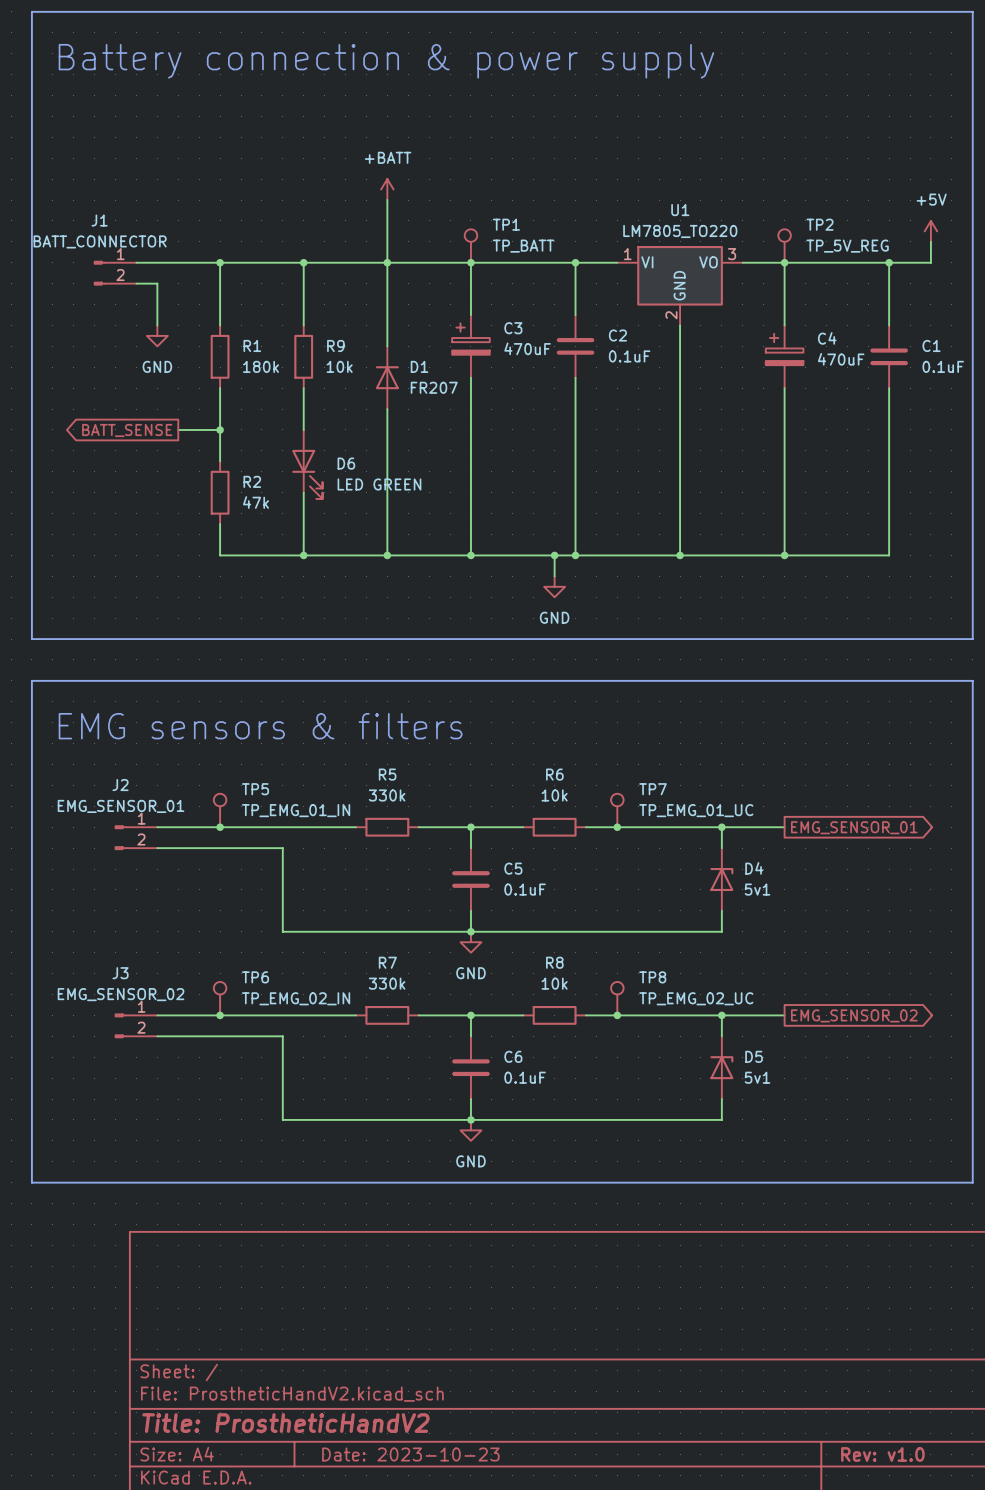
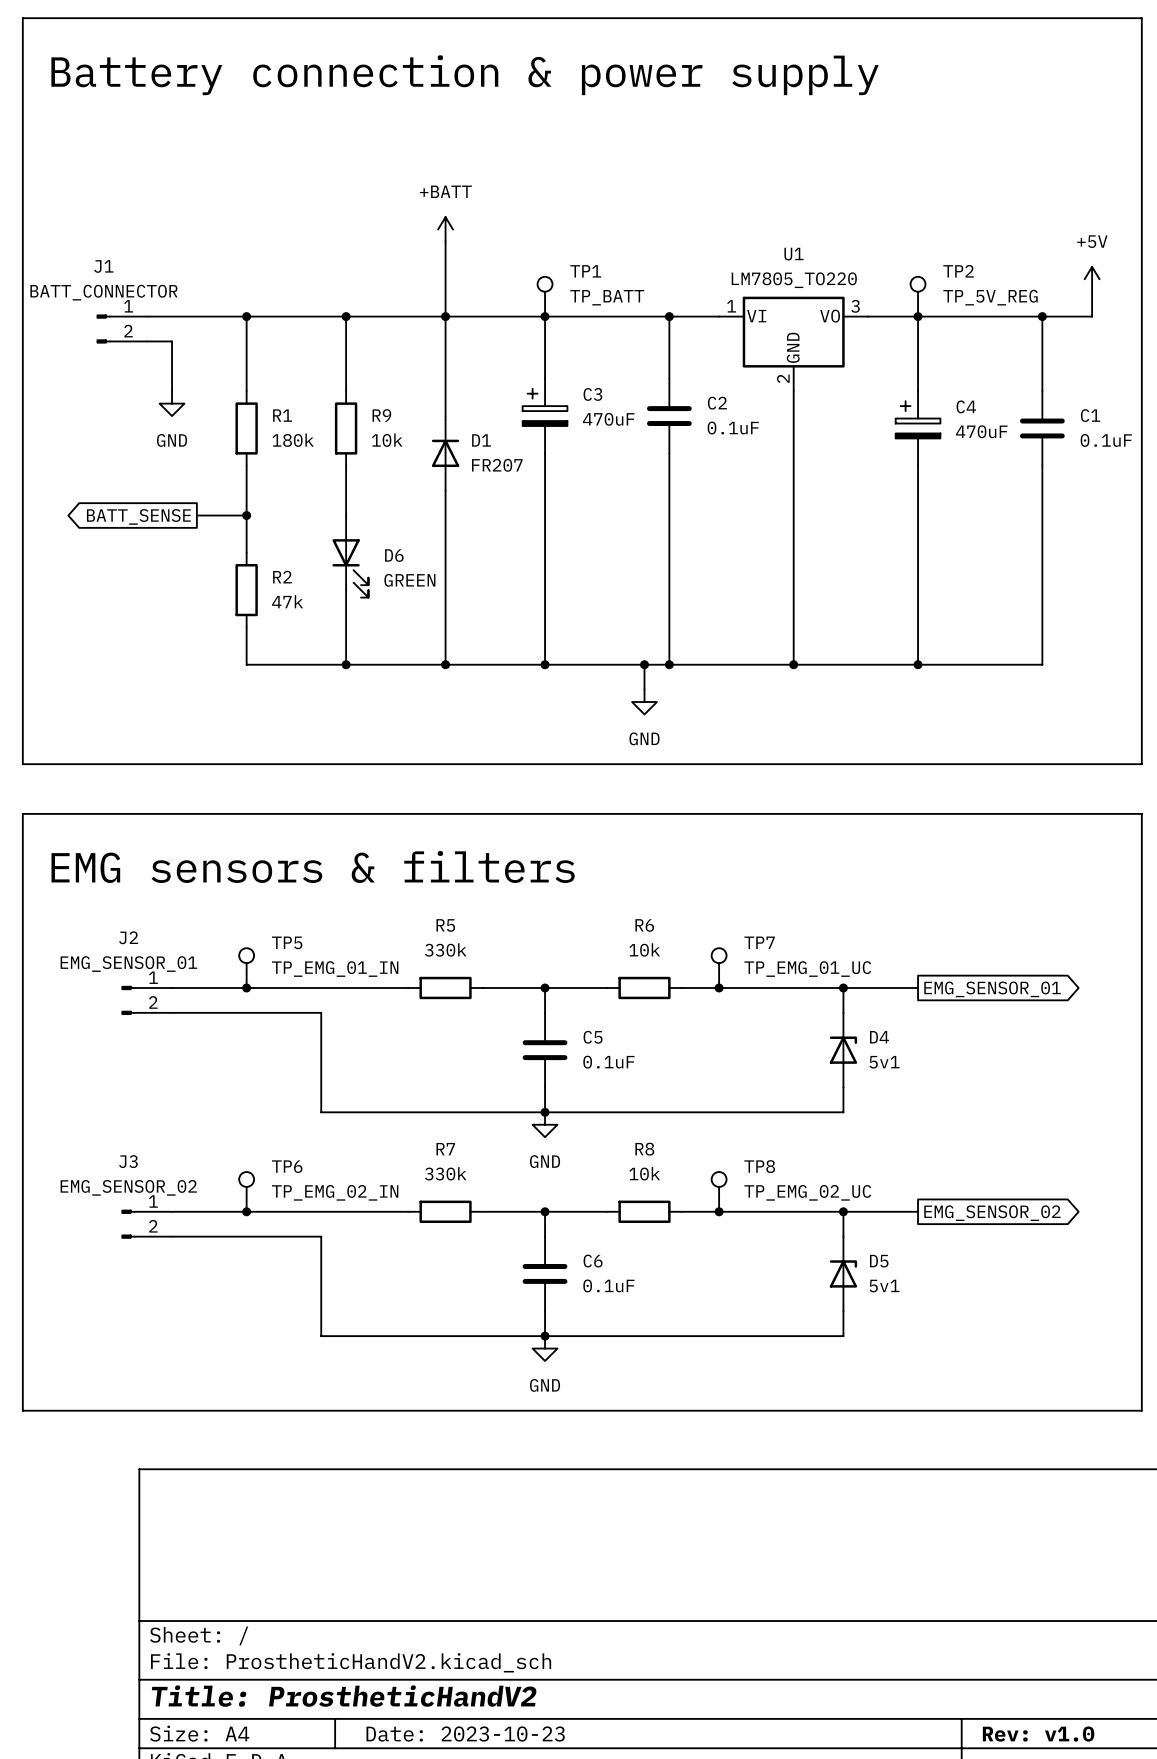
D6 value: LED GREEN (379, 484) -> GREEN (409, 580)

